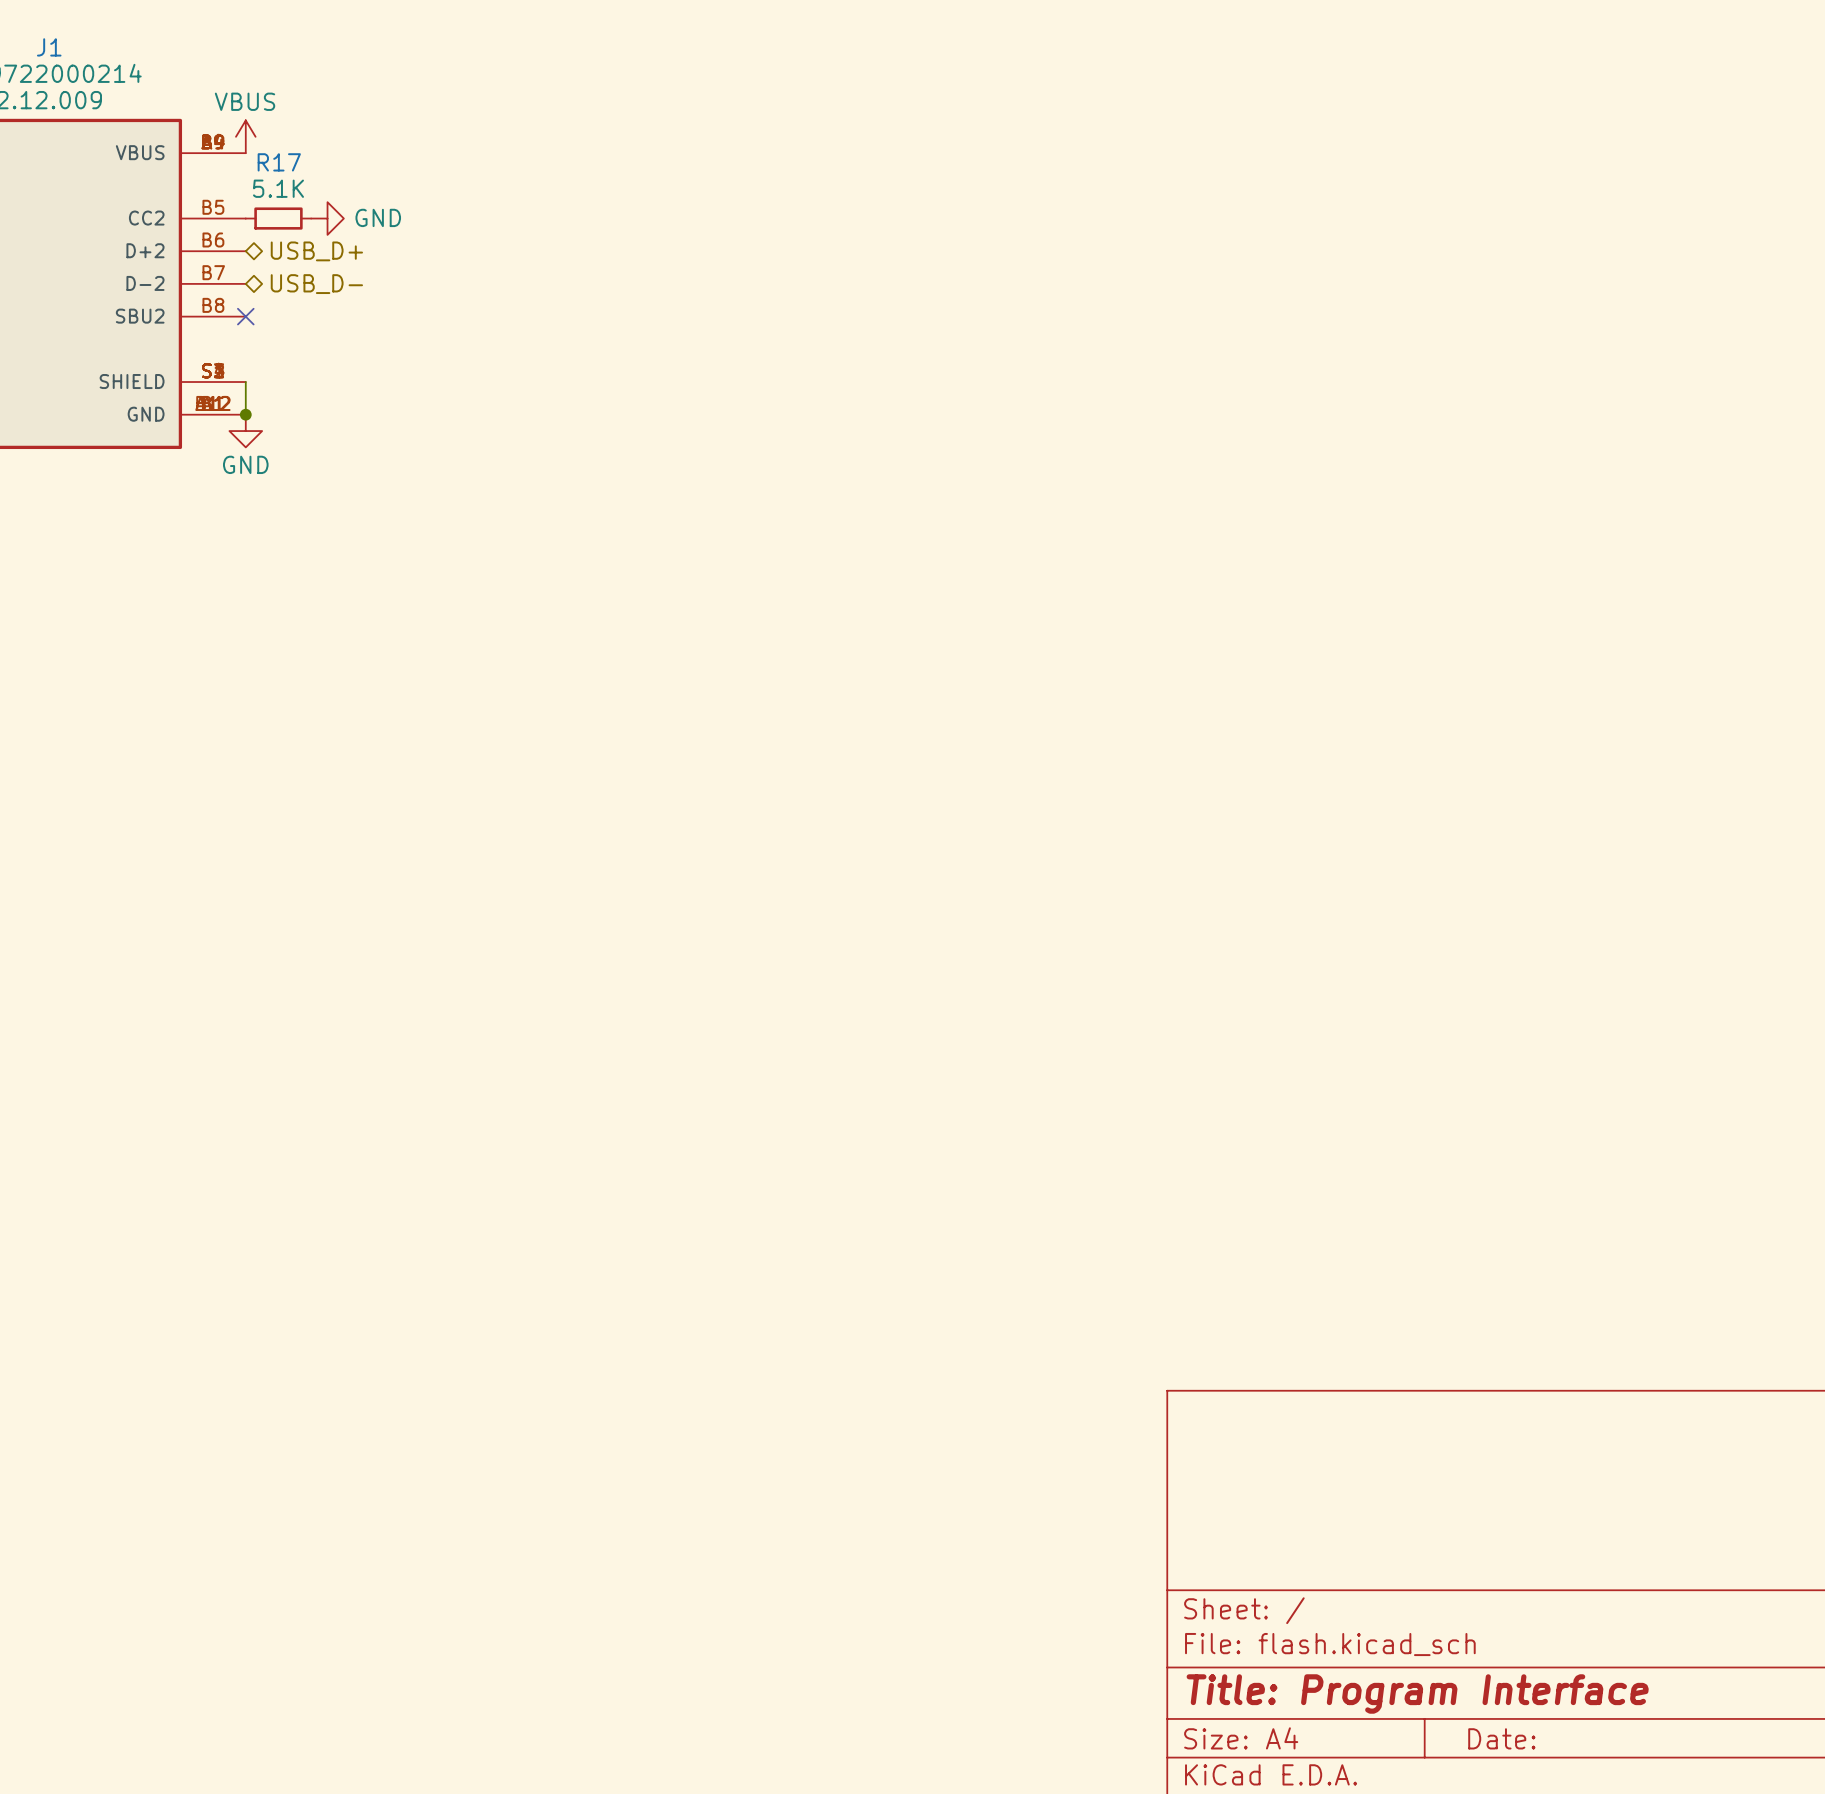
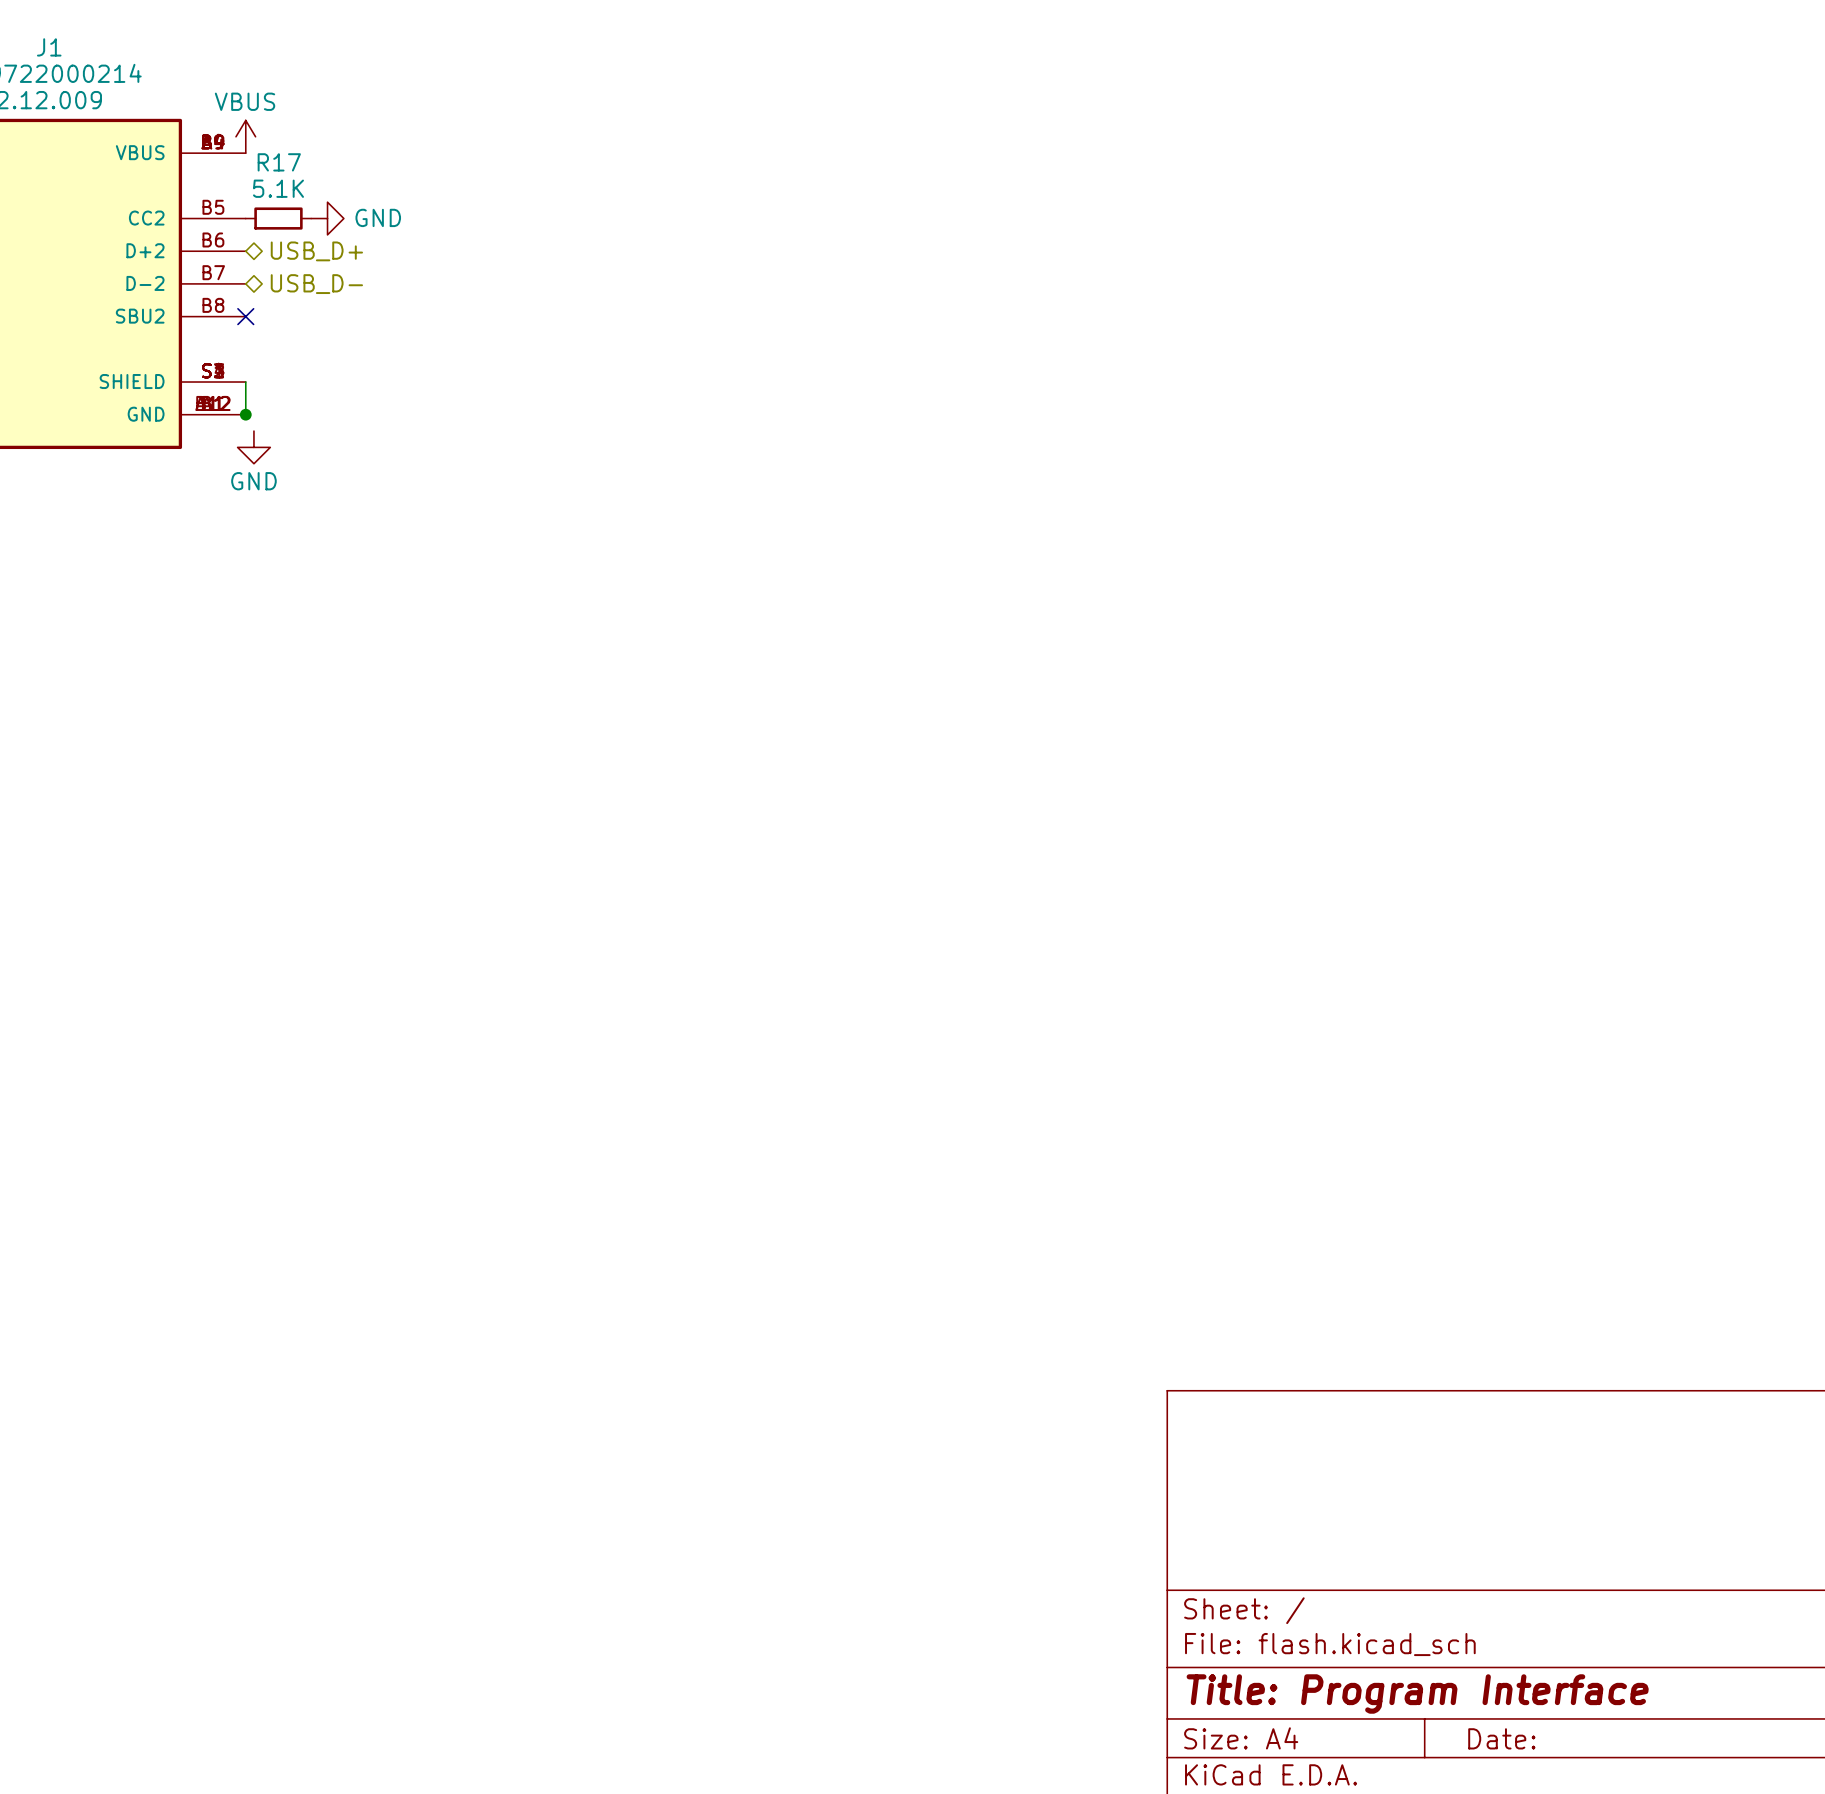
power symbol position: GND (245, 431) -> GND (253, 447)

